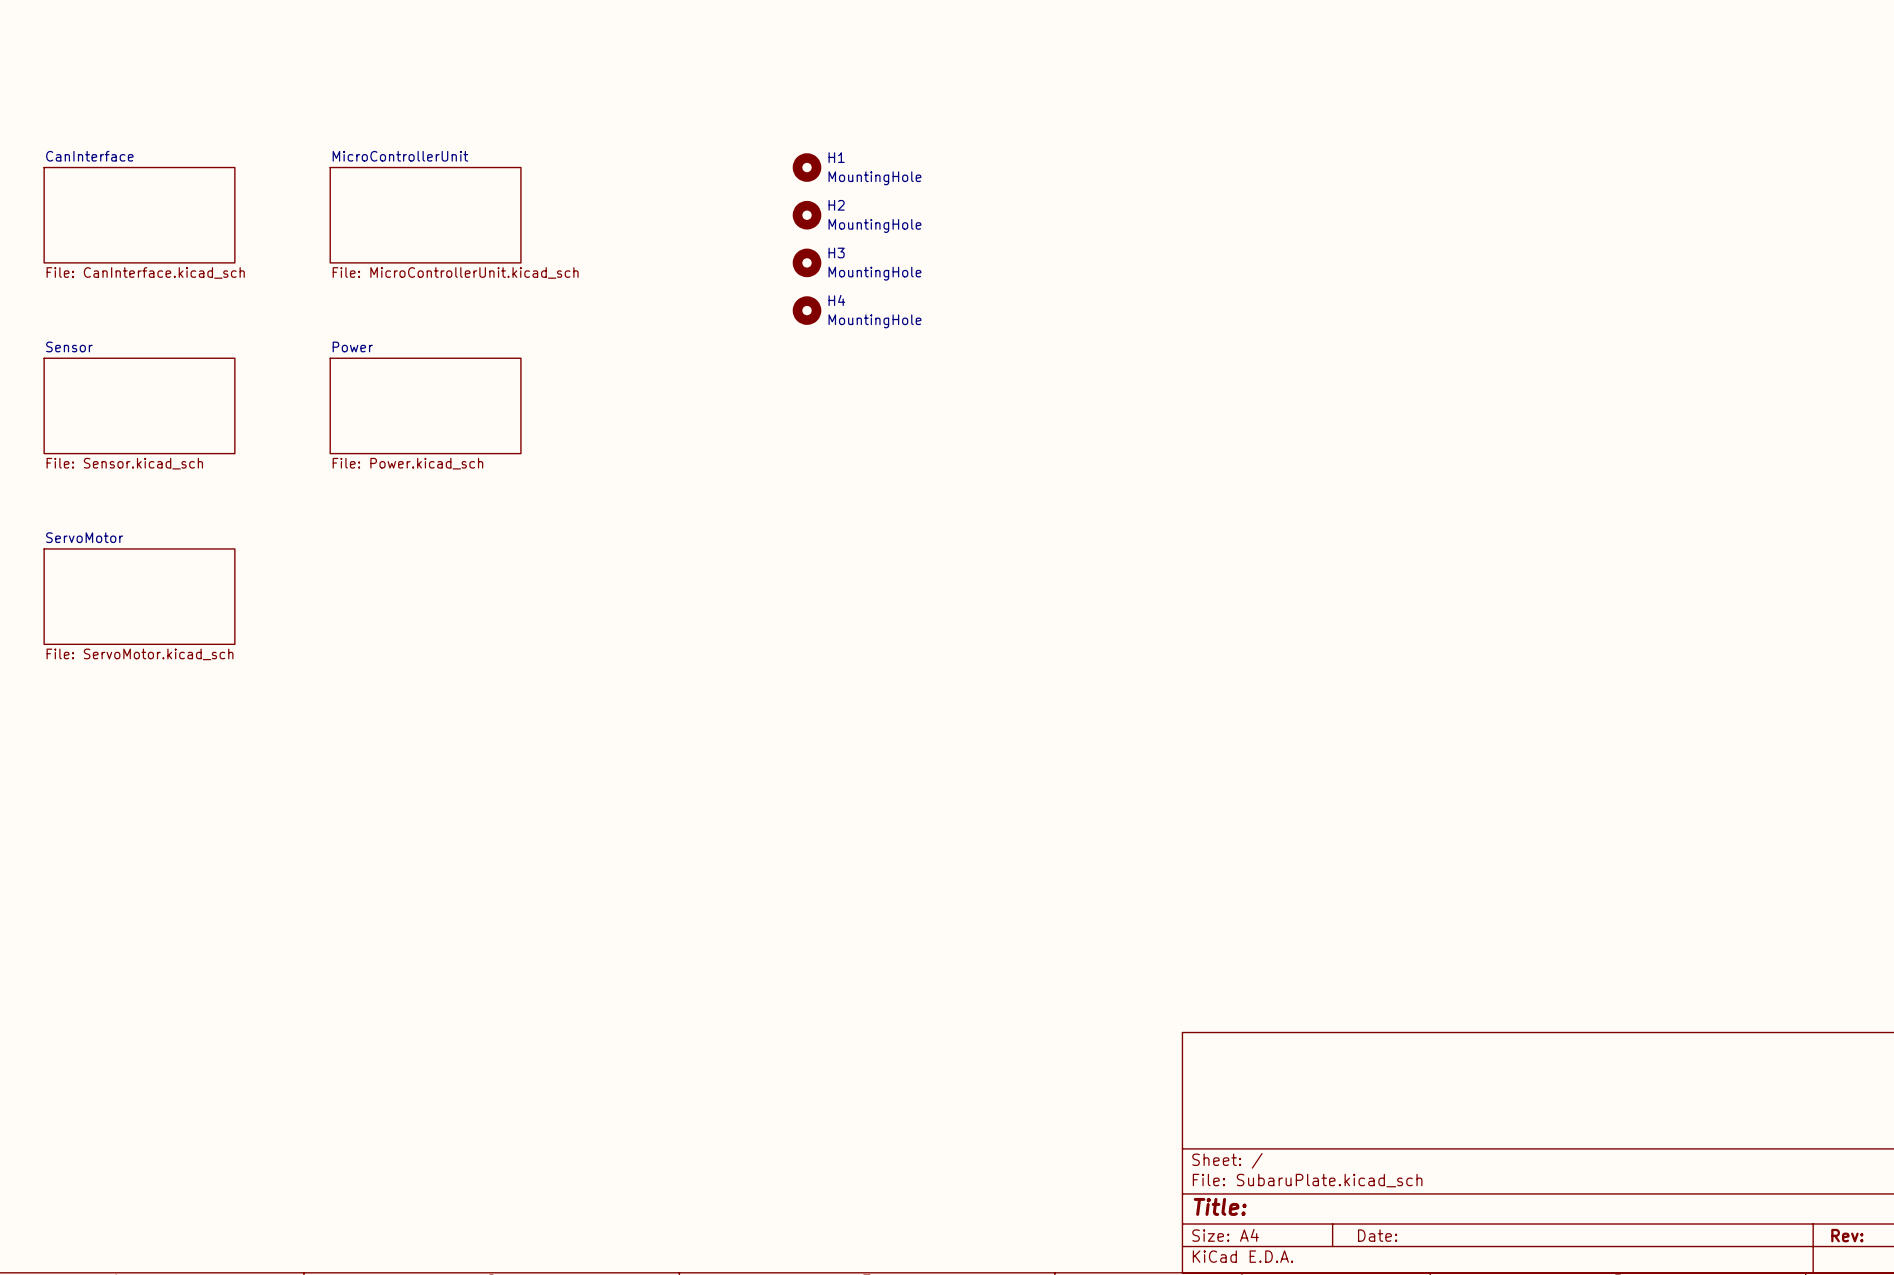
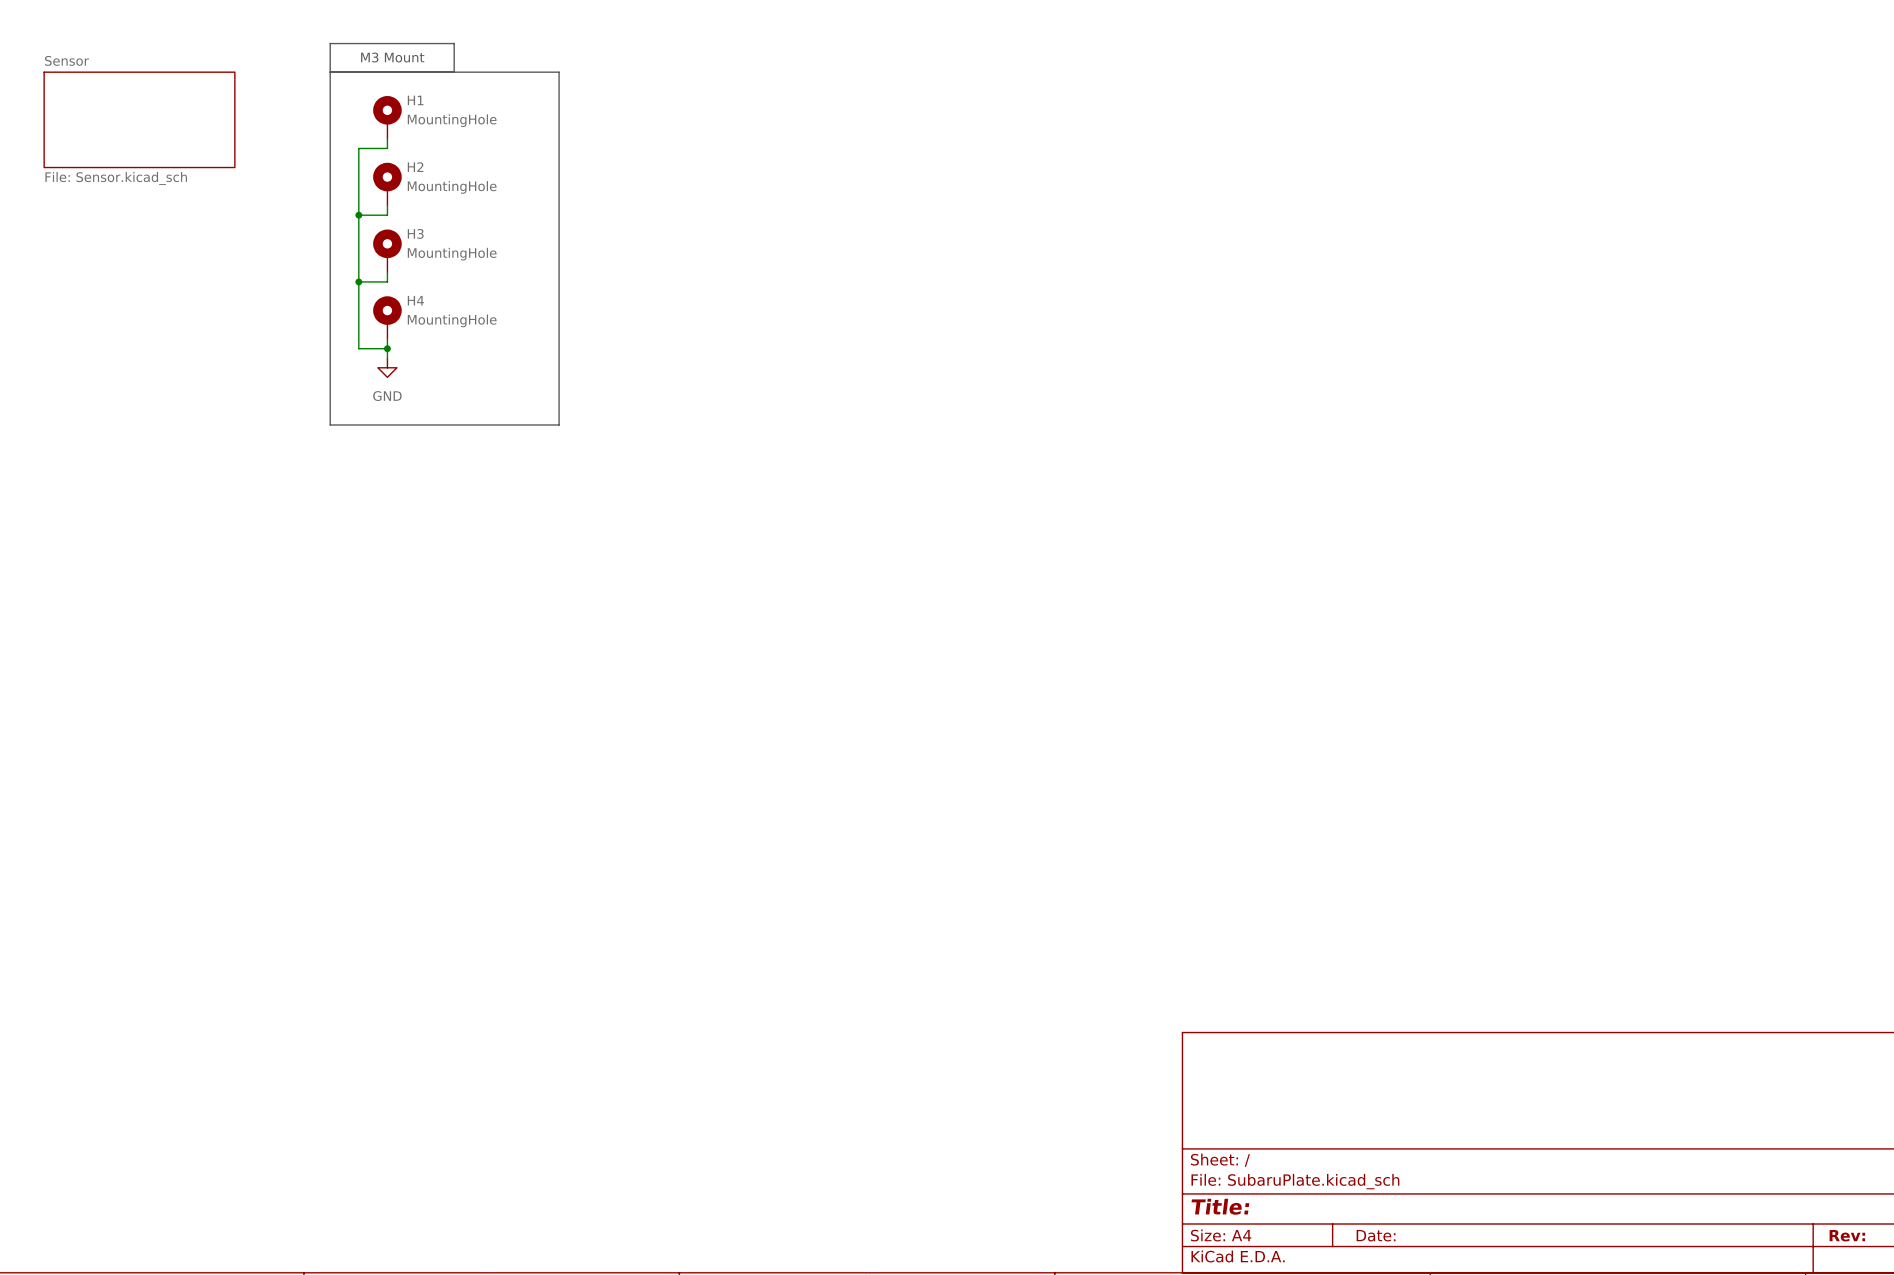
text: none -> M3 Mount (392, 57)
line: none -> (330, 72) (559, 72) (559, 425) (330, 425) (330, 43) (454, 43) (454, 72)
sheet Sensor: none -> File: Sensor.kicad_sch (139, 119)
wire: none -> (387, 138) (387, 148) (358, 148) (358, 348) (387, 348)
H1 symbol: [792, 153, 822, 182] -> [373, 96, 402, 139]
H2 symbol: [792, 200, 822, 230] -> [373, 162, 402, 206]
wire: none -> (387, 205) (387, 215) (358, 215)
sheet CanInterface: File: CanInterface.kicad_sch (139, 215) -> none
junction: none -> (358, 215)
sheet MicroControllerUnit: File: MicroControllerUnit.kicad_sch (425, 215) -> none
H3 symbol: [792, 248, 822, 278] -> [373, 229, 402, 273]
wire: none -> (387, 272) (387, 281) (358, 281)
junction: none -> (358, 281)
H4 symbol: [792, 296, 822, 325] -> [373, 296, 402, 340]
wire: none -> (387, 339) (387, 358)
junction: none -> (387, 348)
power symbol: none -> GND (387, 367)
sheet Sensor: File: Sensor.kicad_sch (139, 405) -> none
sheet Power: File: Power.kicad_sch (425, 405) -> none
sheet ServoMotor: File: ServoMotor.kicad_sch (139, 596) -> none

